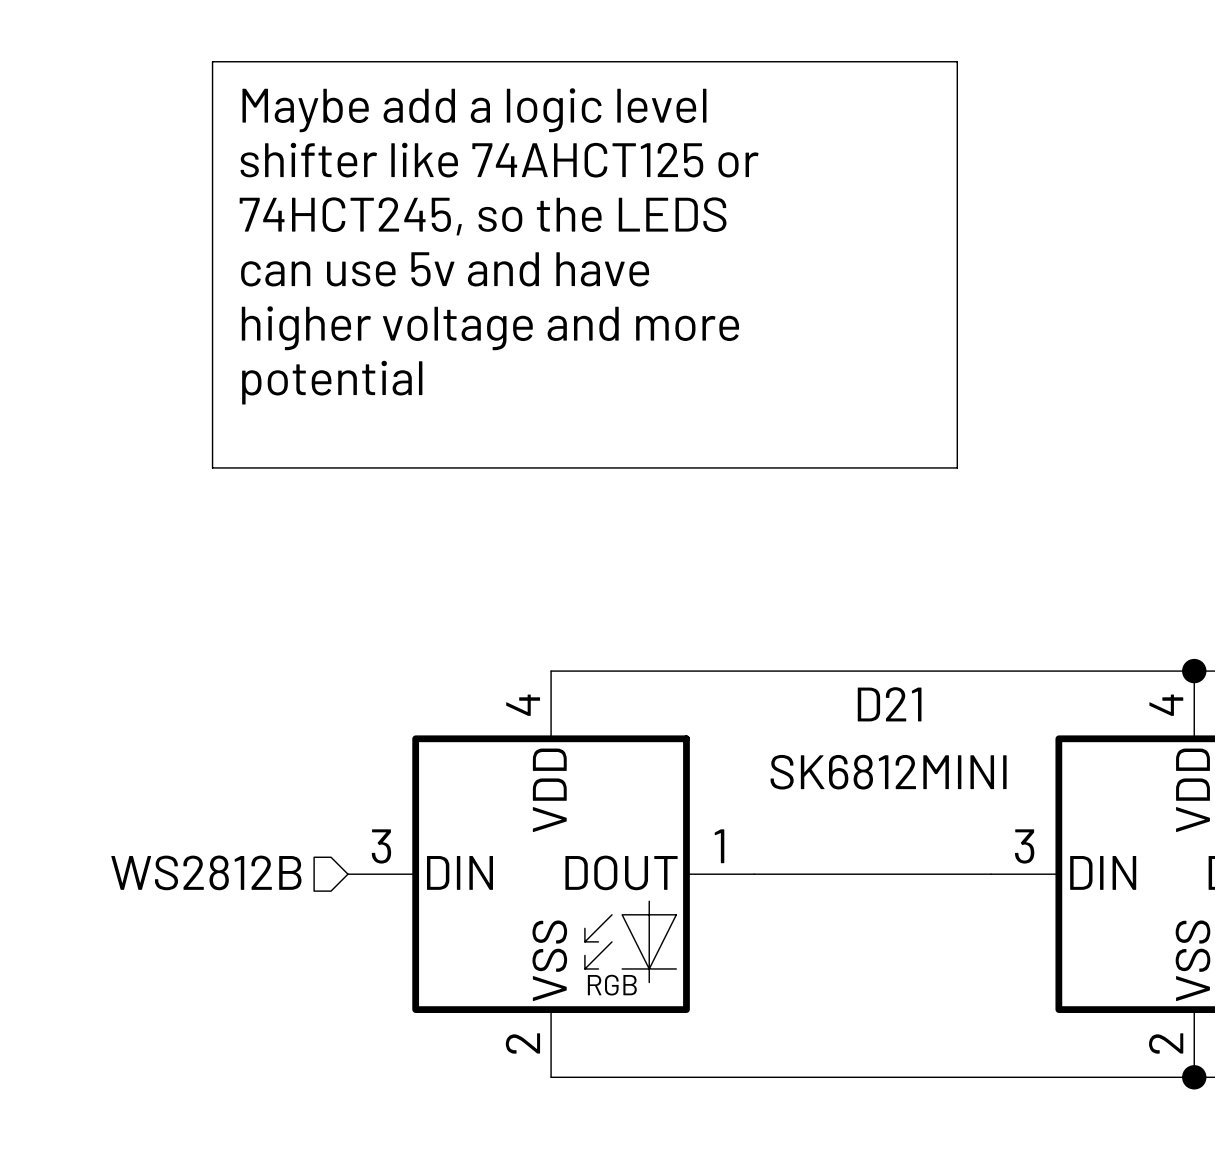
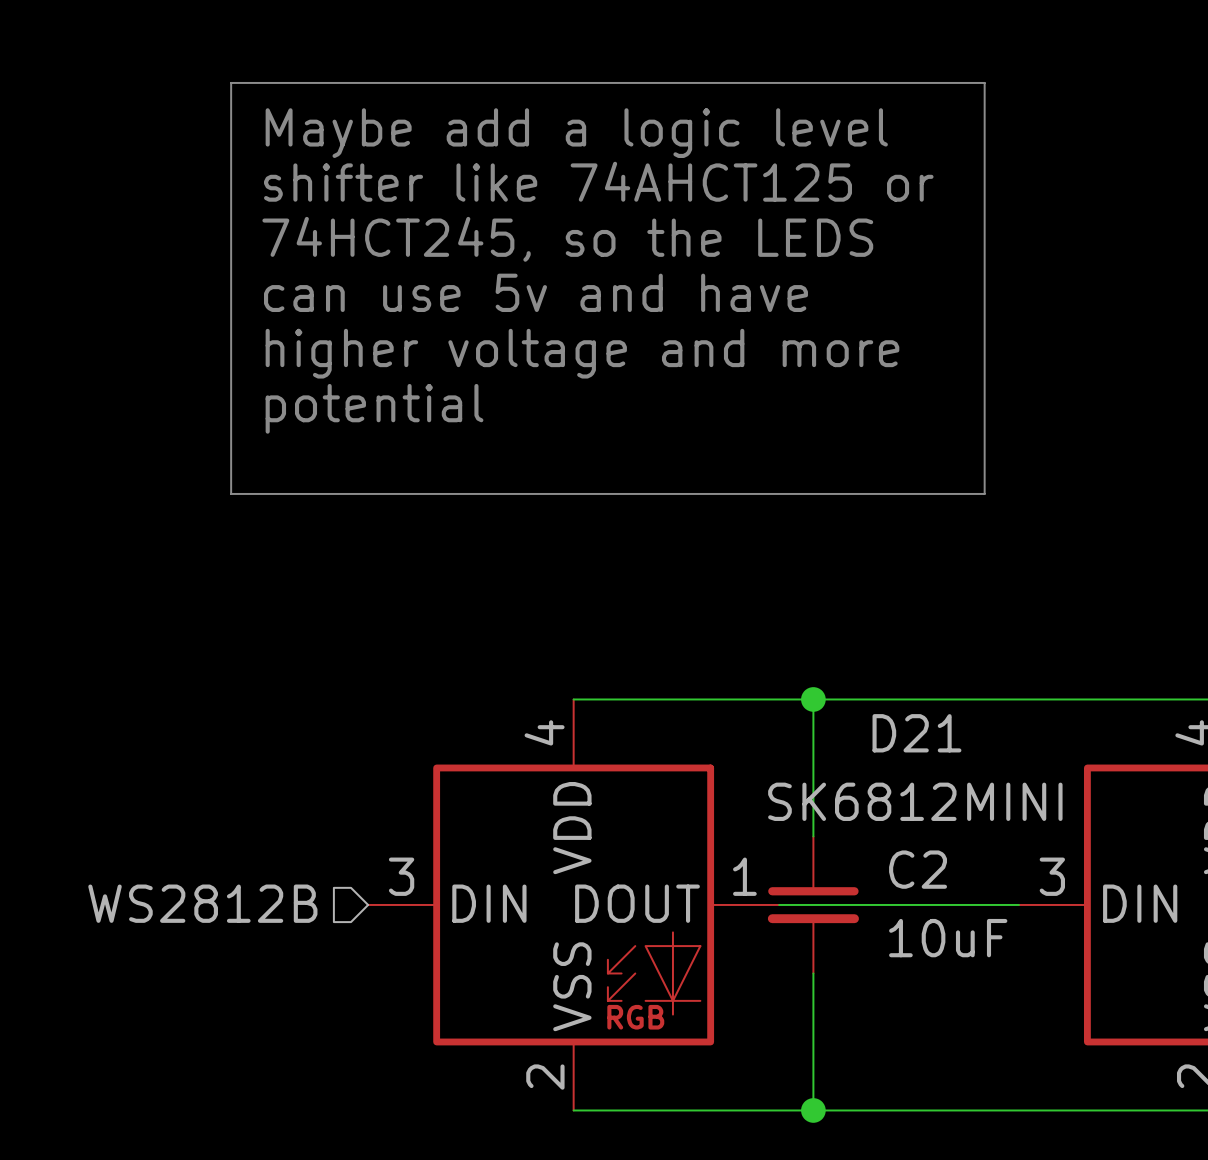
wire: none -> (813, 699) (813, 836)
junction: none -> (813, 699)
C2: none -> 10uF (813, 904)
wire: none -> (813, 973) (813, 1110)
junction: none -> (813, 1110)

